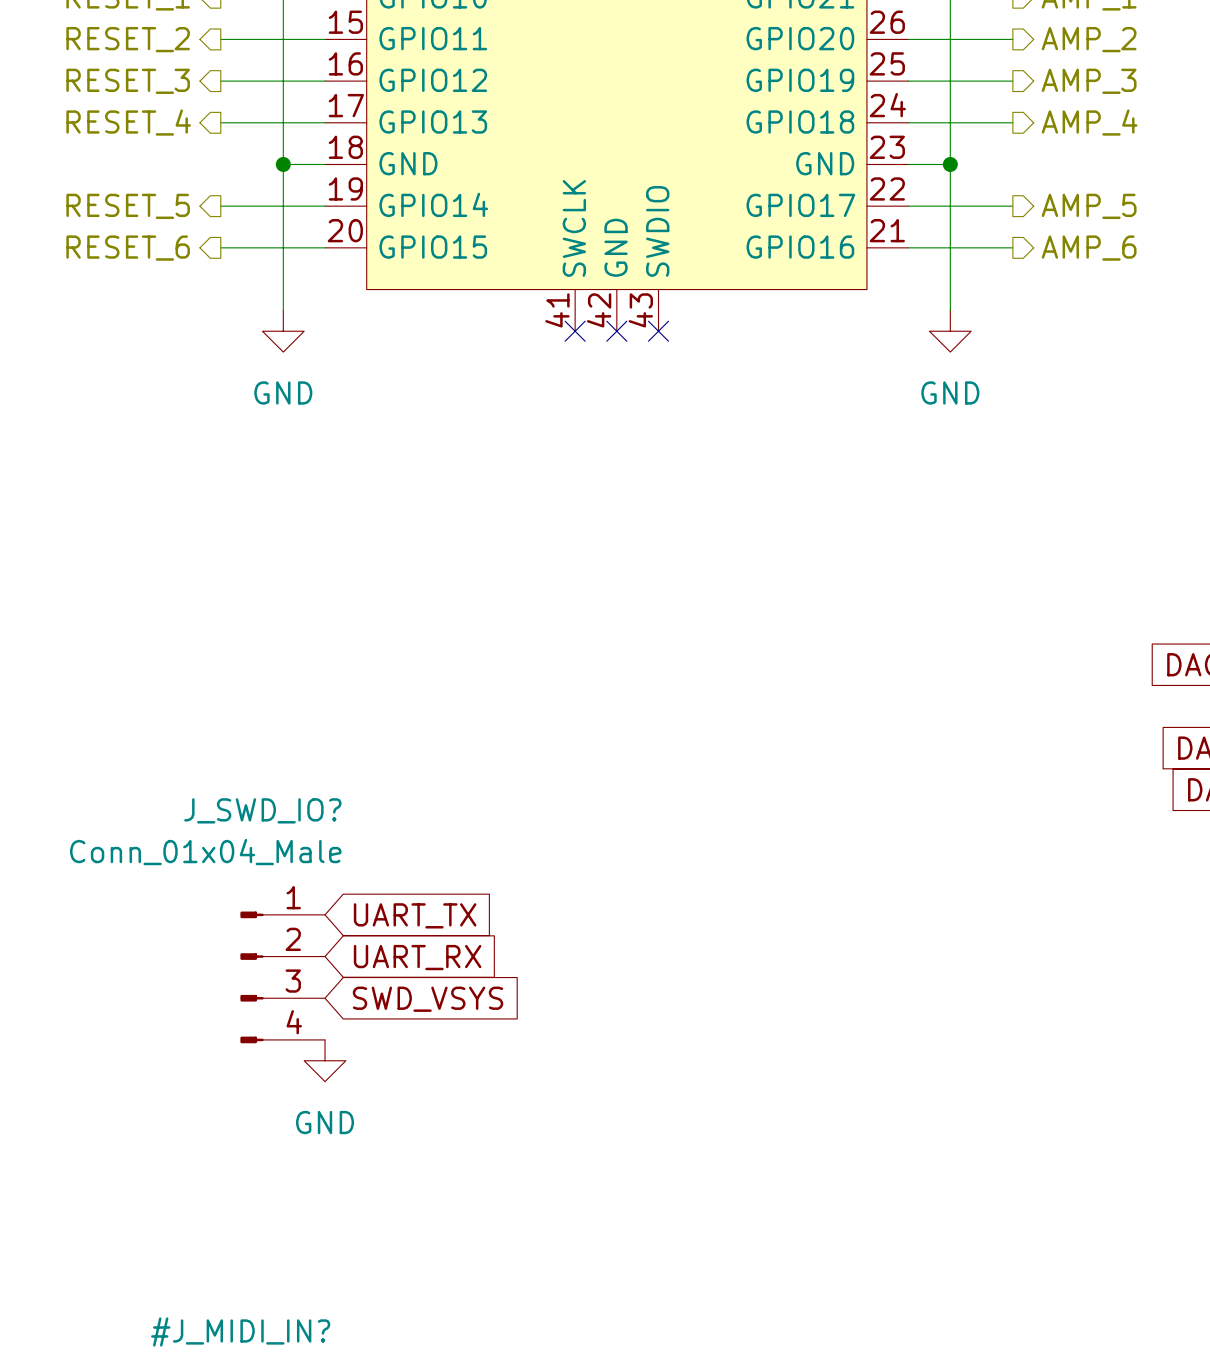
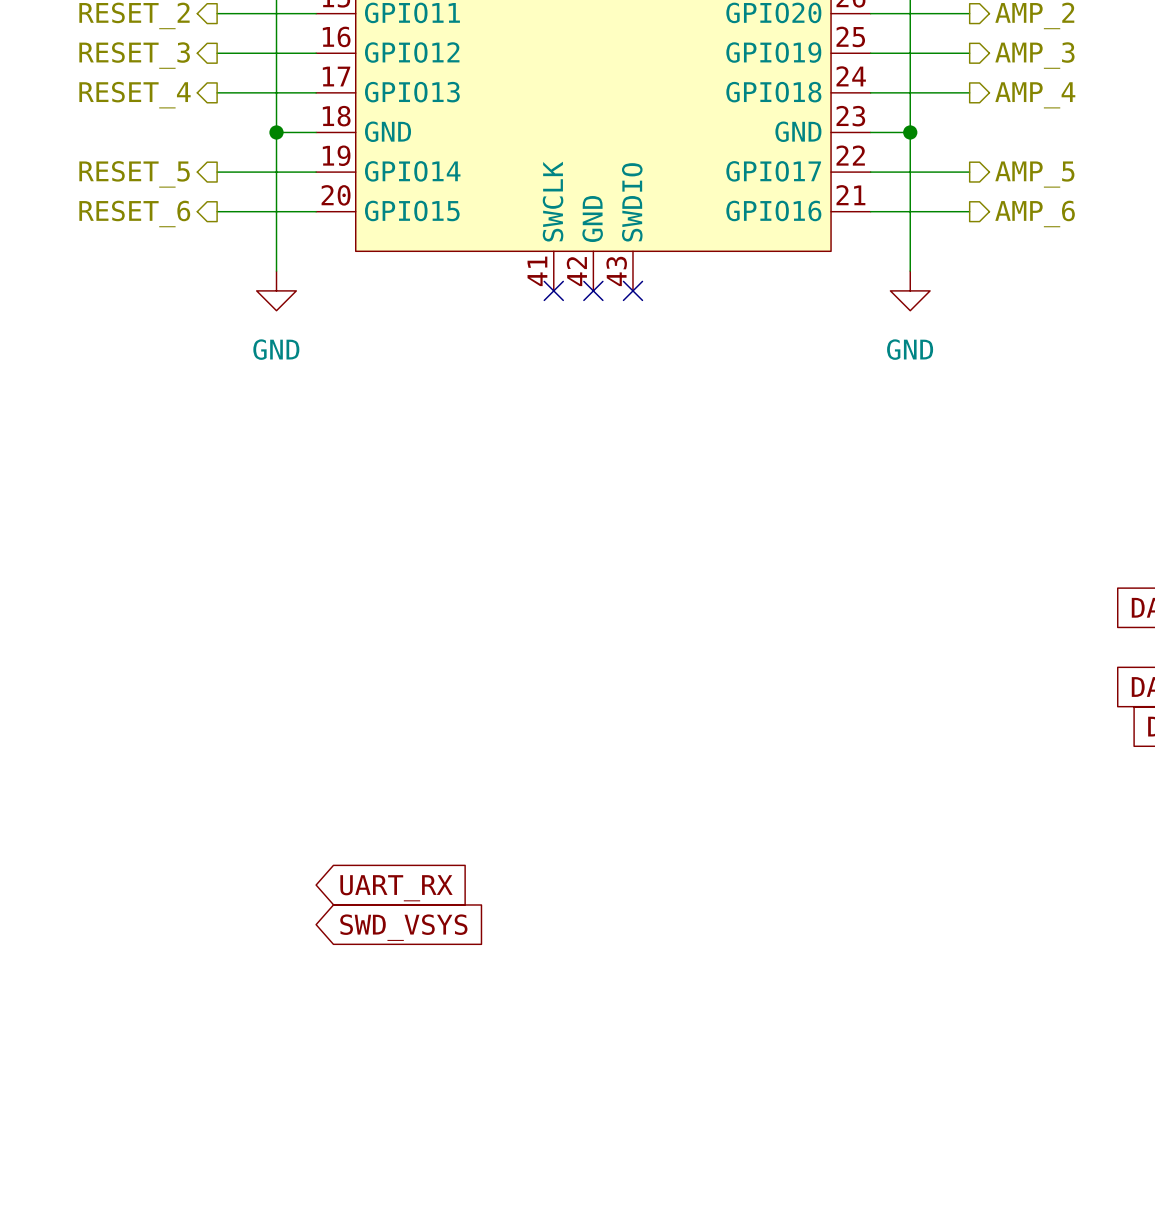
global label: UART_TX (415, 915) -> none
J_SWD_IO?: Conn_01x04_Male (282, 977) -> none
power symbol: GND (325, 1060) -> none

